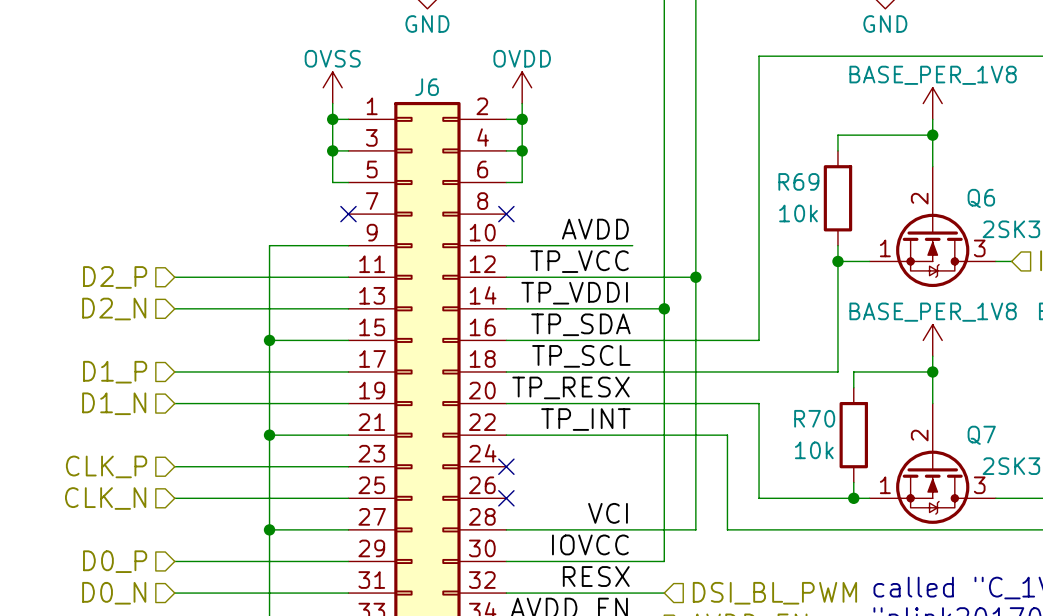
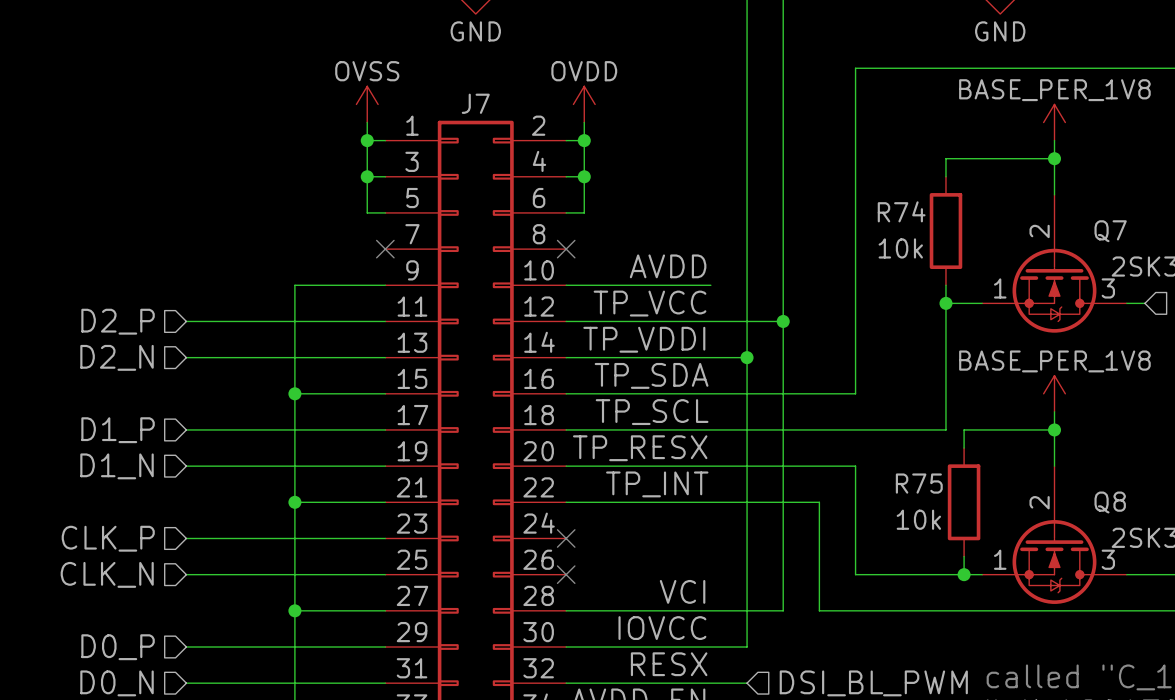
J6 name: J6 (427, 87) -> J7 (475, 103)
R69 name: R69 (798, 181) -> R74 (901, 211)
Q6 name: Q6 (981, 198) -> Q7 (1110, 231)
R70 name: R70 (814, 418) -> R75 (919, 483)
Q7 name: Q7 (981, 435) -> Q8 (1110, 502)

